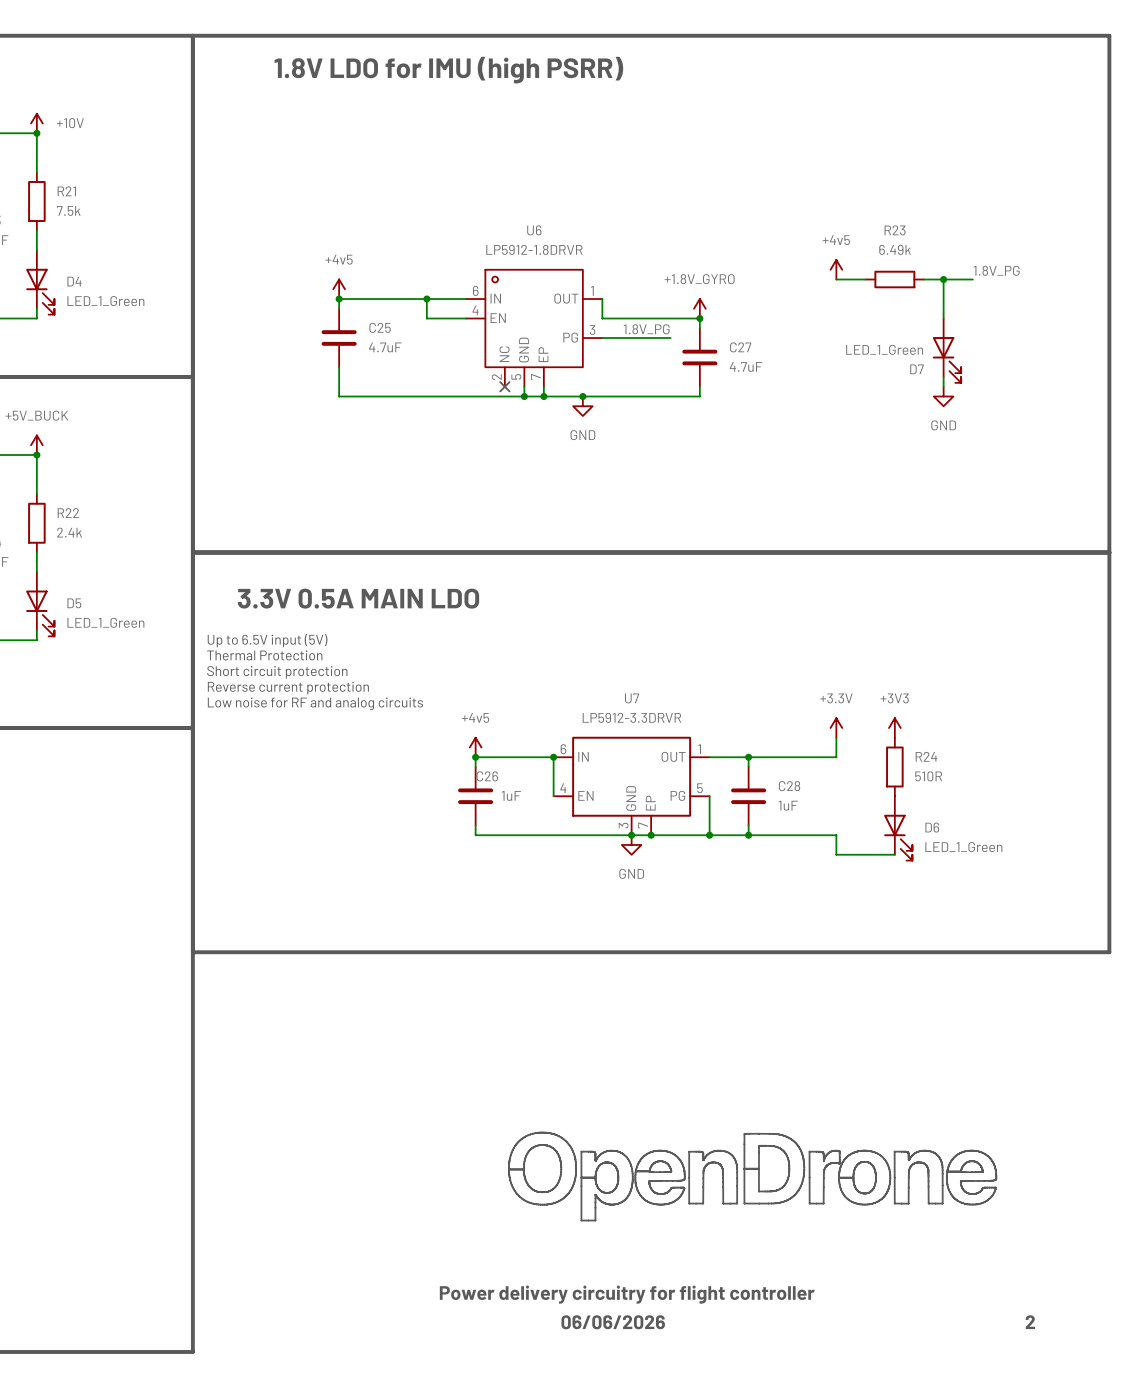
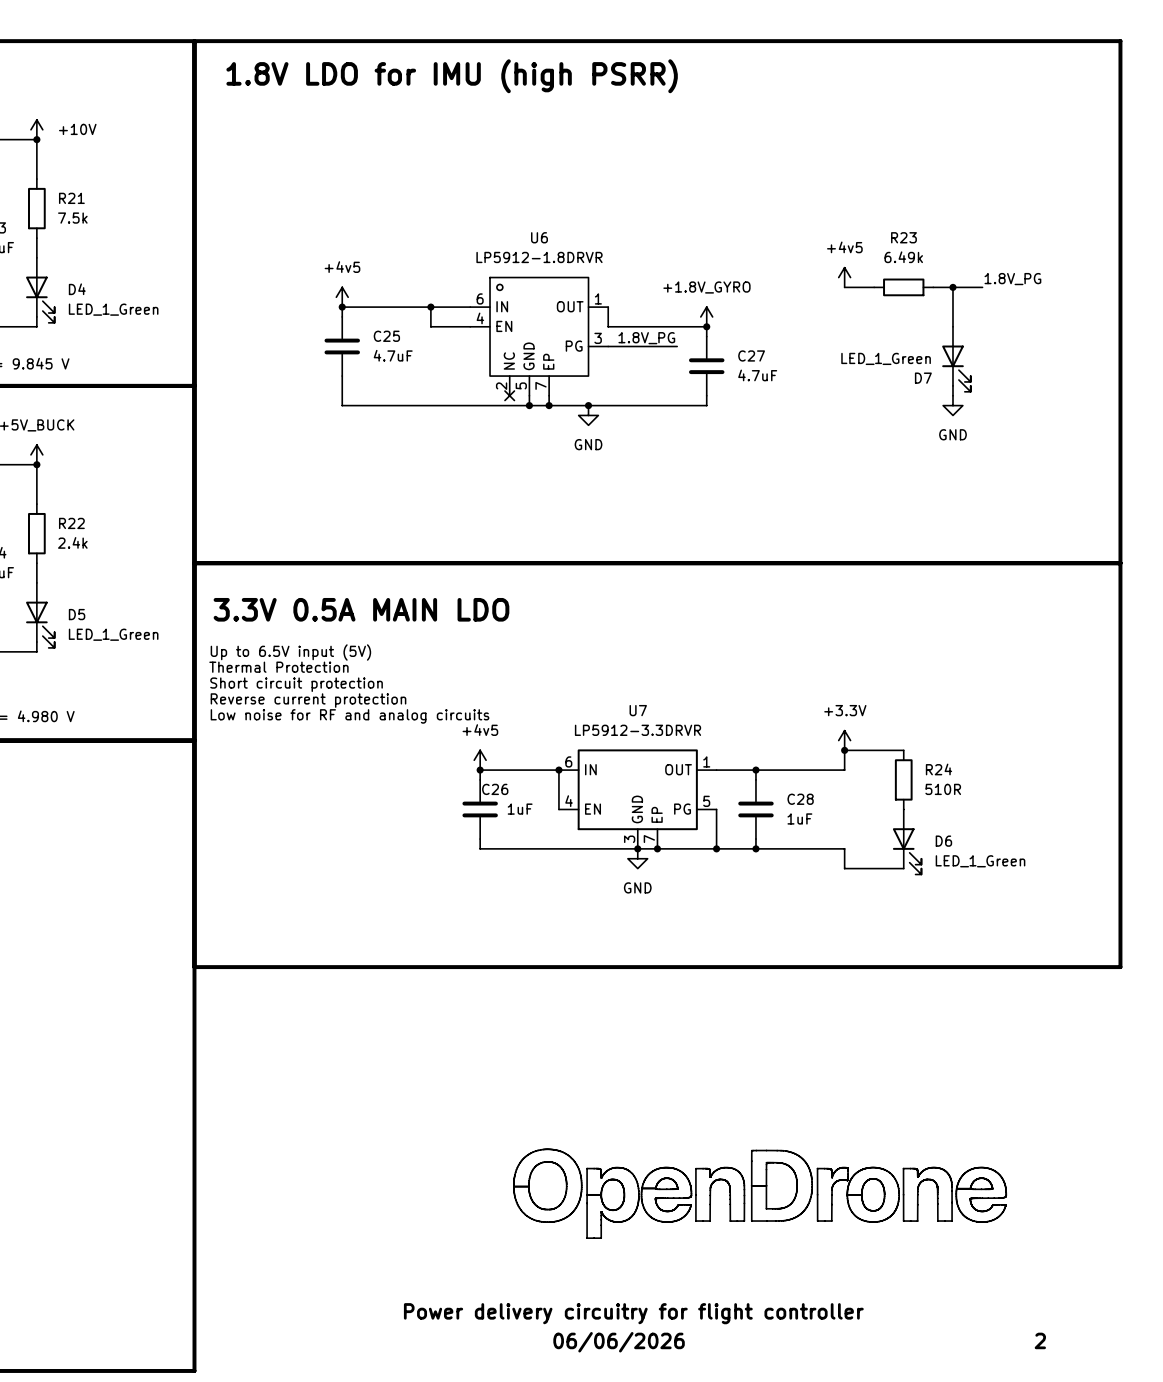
power symbol: +3V3 (894, 727) -> none
wire: none -> (844, 750) (903, 750)
junction: none -> (844, 750)

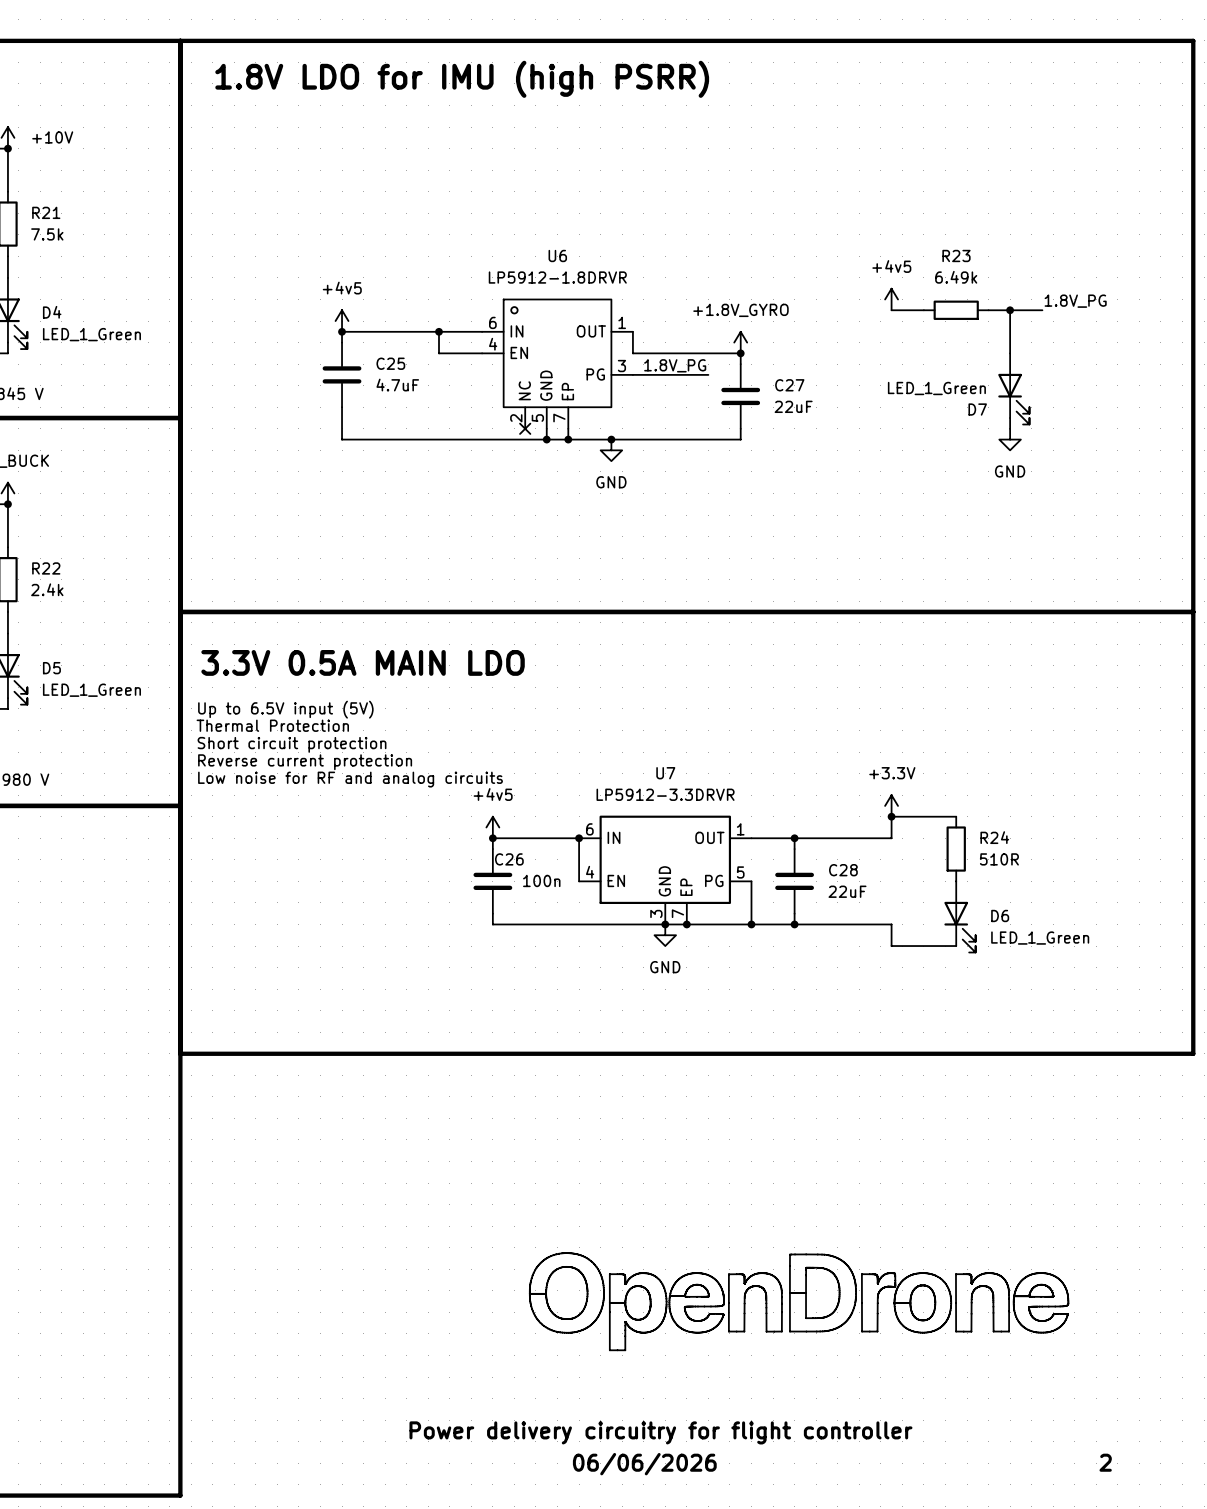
C27 value: 4.7uF (757, 375) -> 22uF (793, 406)
C26 value: 1uF (520, 809) -> 100n (541, 880)
C28 value: 1uF (799, 818) -> 22uF (847, 891)

